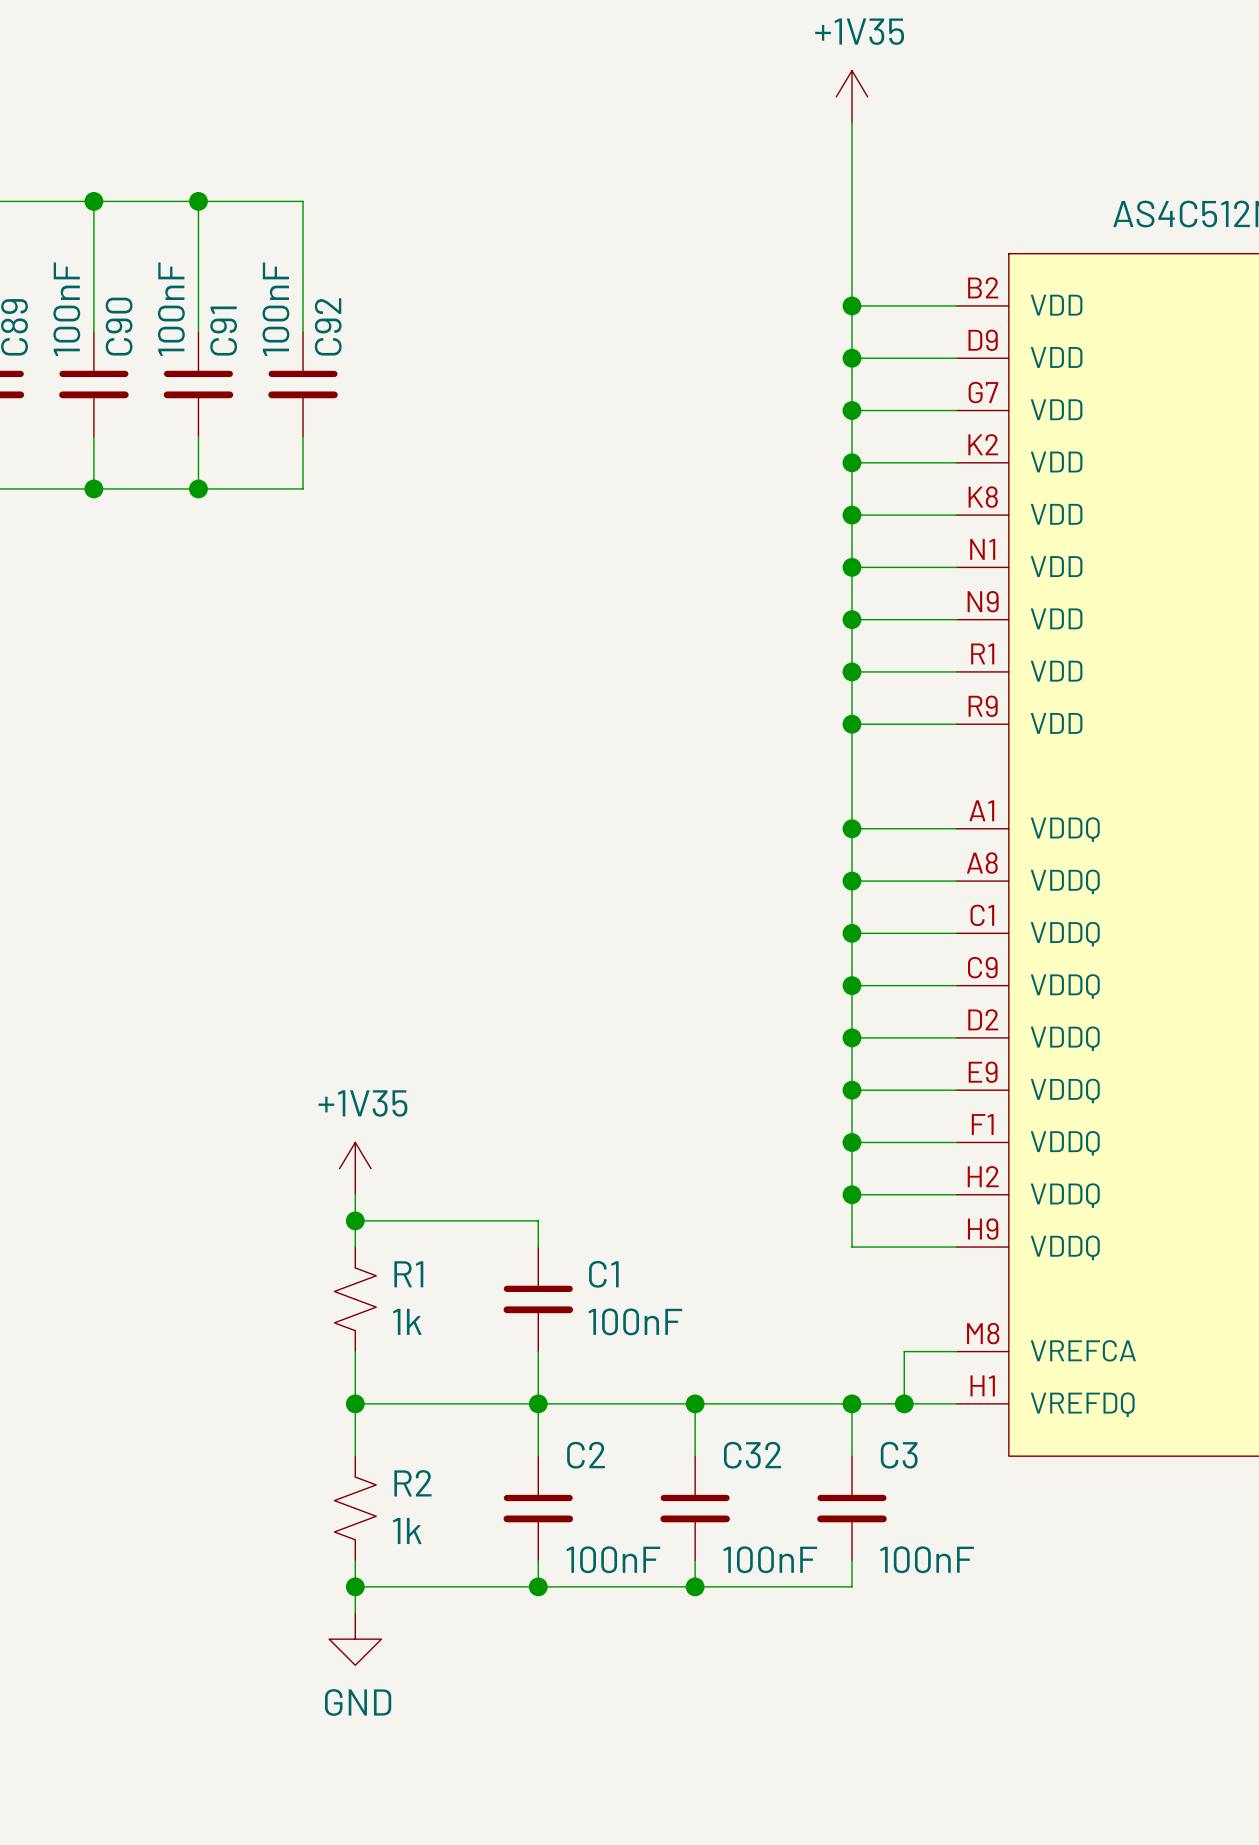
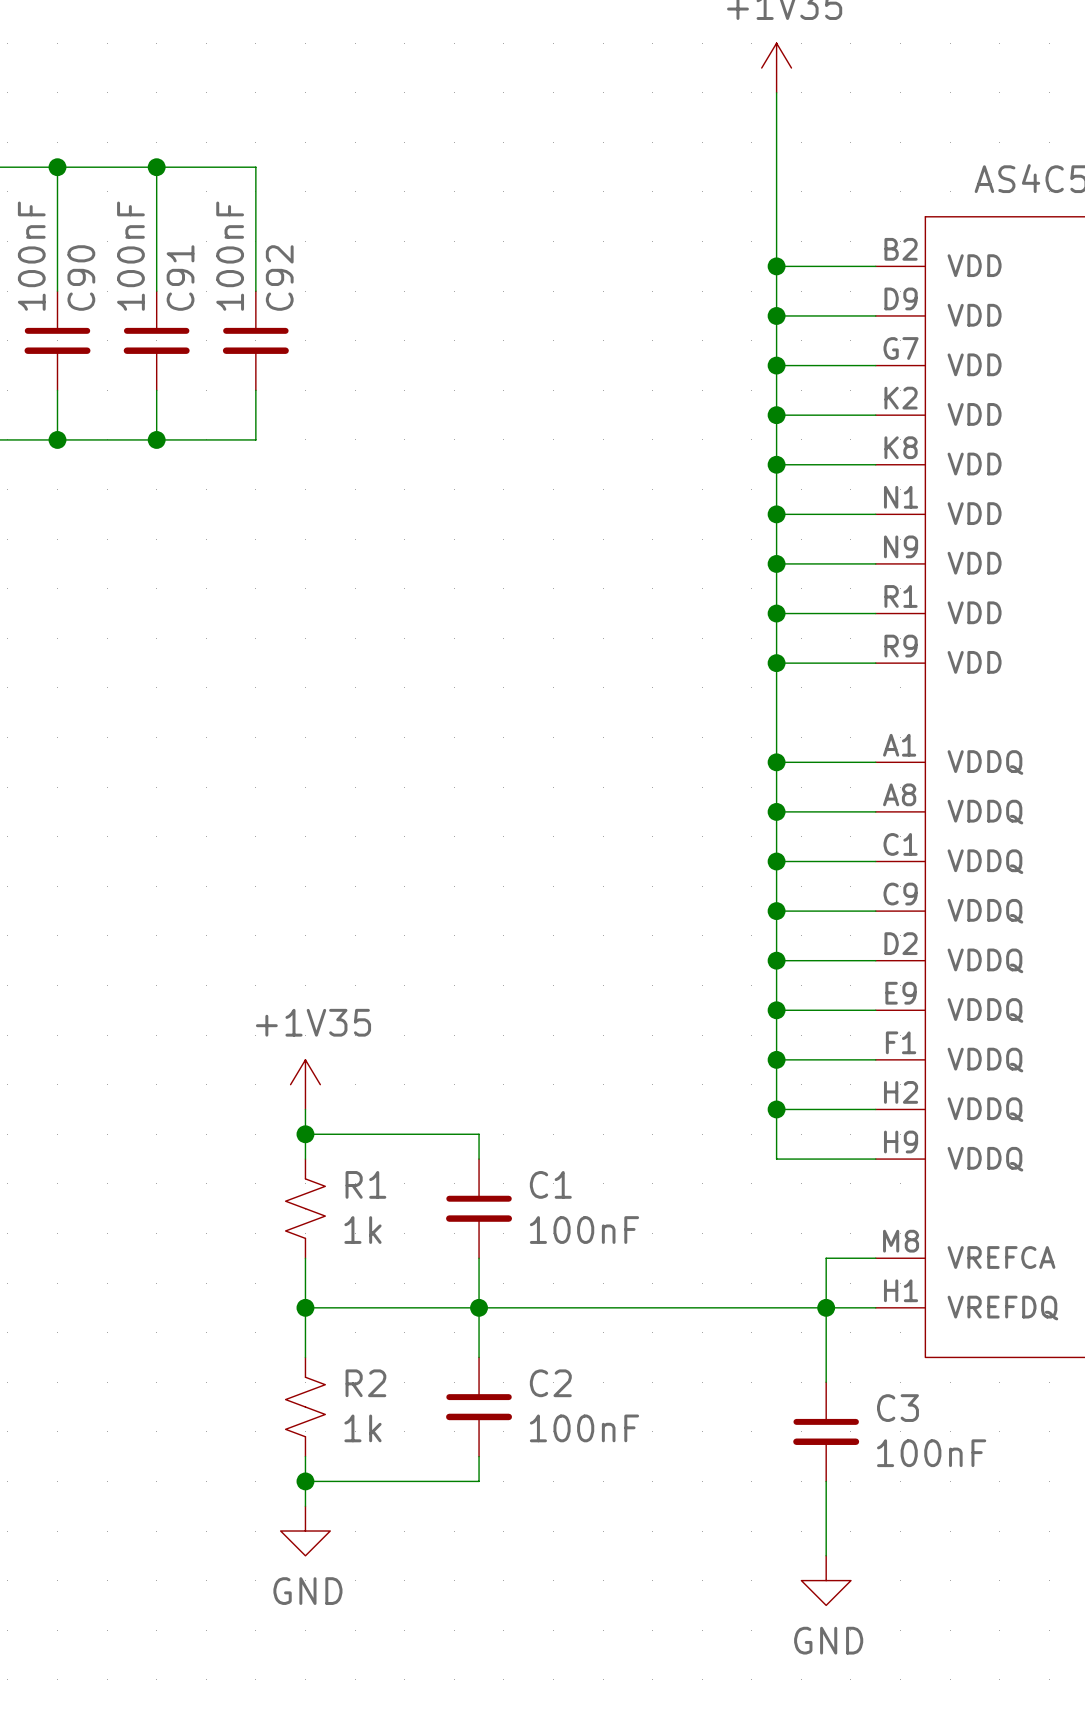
wire: (695, 1403) (695, 1456) -> none
junction: (695, 1403) -> none
wire: (851, 1403) (851, 1456) -> none
junction: (851, 1403) -> none
wire: none -> (826, 1307) (826, 1382)
C2 name position: C2 (586, 1455) -> C2 (550, 1383)
C3 name position: C3 (899, 1455) -> C3 (897, 1408)
C32: 100nF (695, 1508) -> none
C3 position: (851, 1508) -> (826, 1431)
C2 value position: 100nF (613, 1559) -> 100nF (584, 1428)
C3 value position: 100nF (927, 1559) -> 100nF (931, 1453)
wire: (695, 1560) (695, 1586) -> none
wire: (851, 1560) (851, 1586) (538, 1586) -> none
junction: (538, 1586) -> none
junction: (695, 1586) -> none
wire: none -> (826, 1481) (826, 1555)
power symbol: none -> GND (826, 1580)

